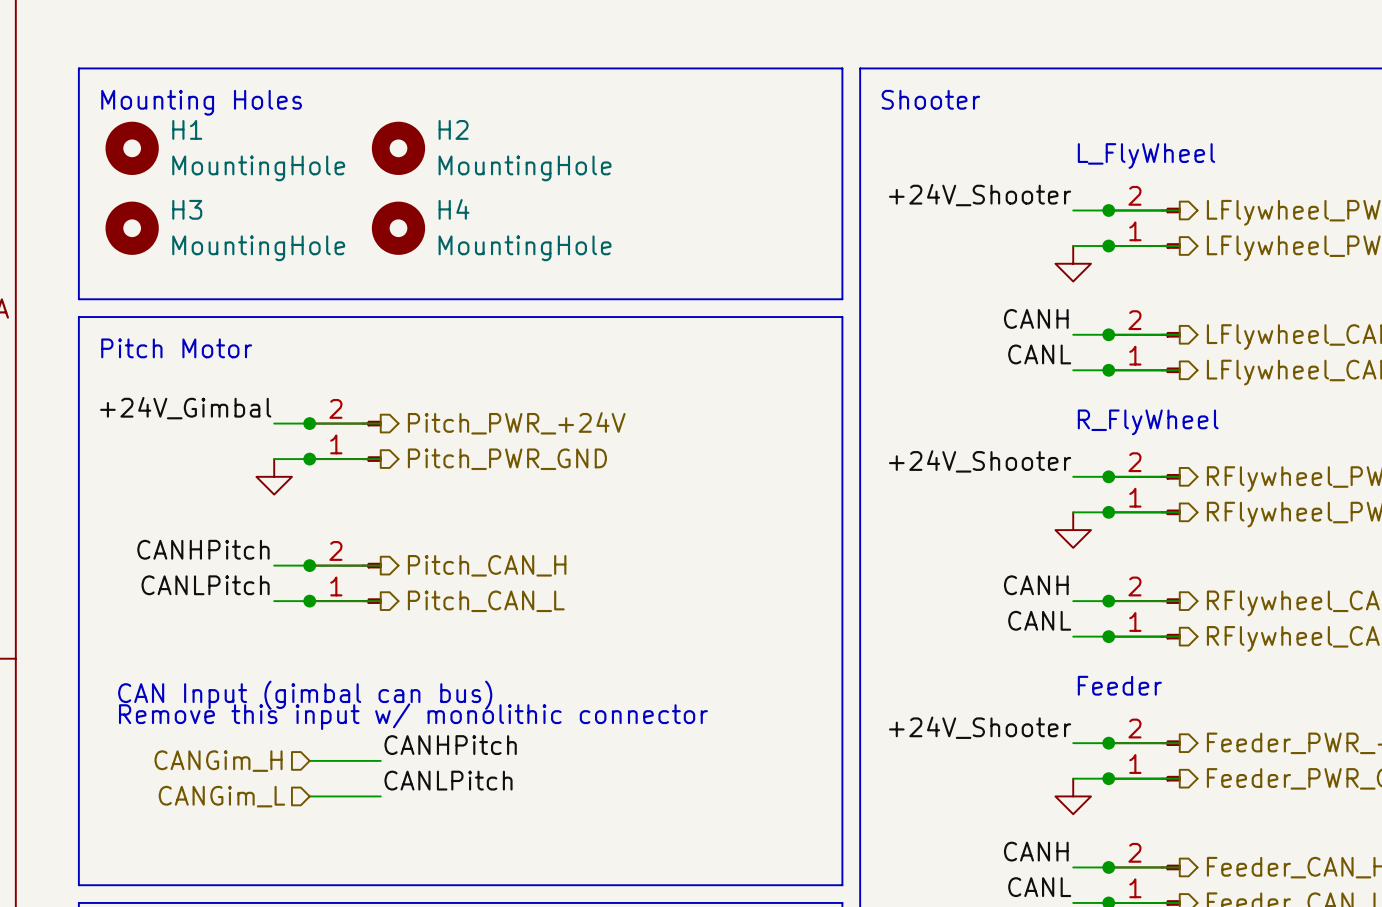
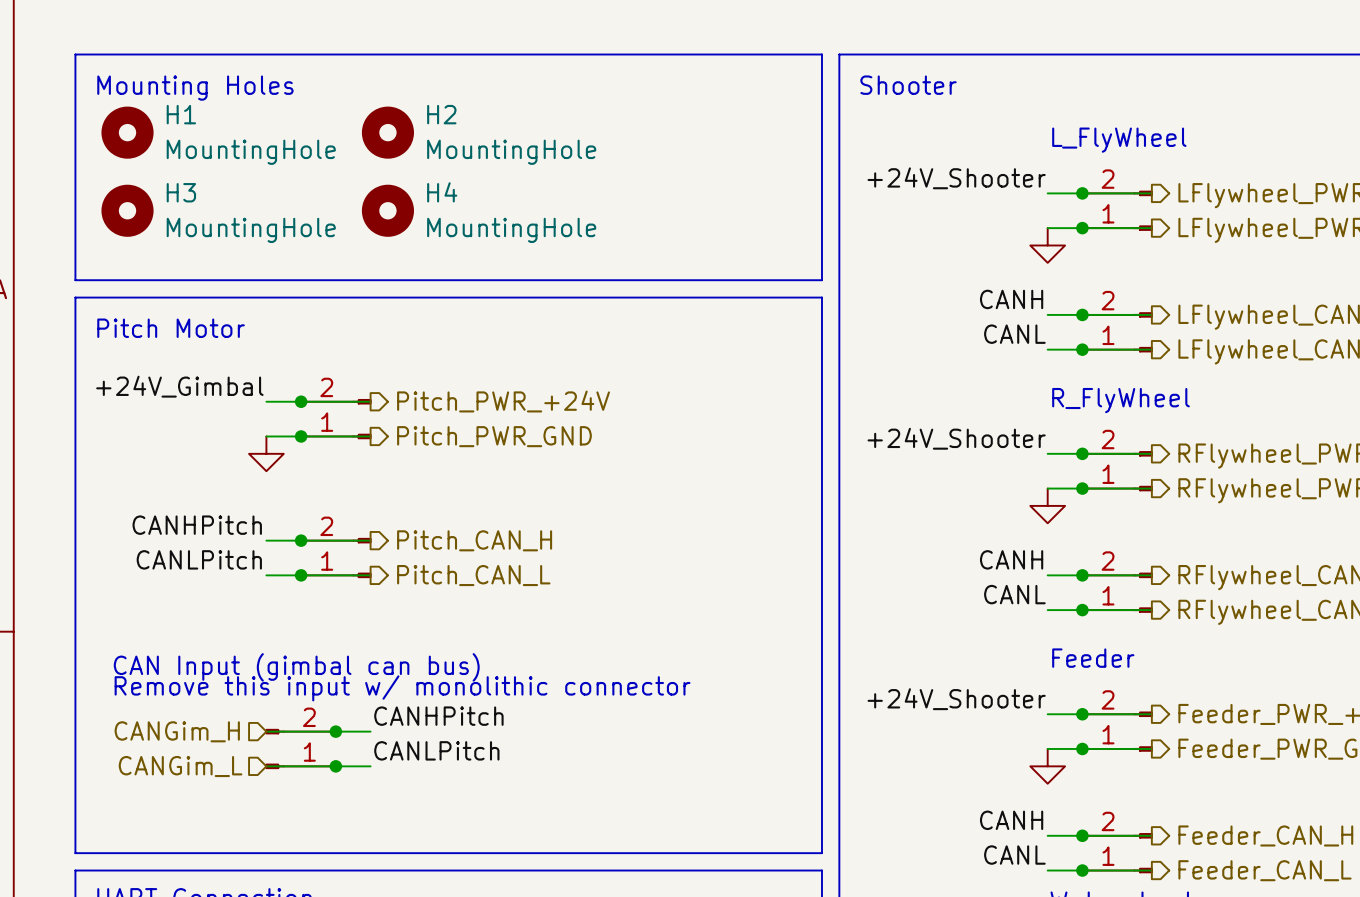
wire: none -> (266, 731) (301, 731)
junction: none -> (335, 731)
hierarchical label position: CANGim_H (218, 761) -> CANGim_H (177, 731)
part: none -> (300, 748)
hierarchical label position: CANGim_L (221, 796) -> CANGim_L (180, 766)
wire: none -> (266, 766) (301, 766)
junction: none -> (335, 766)

